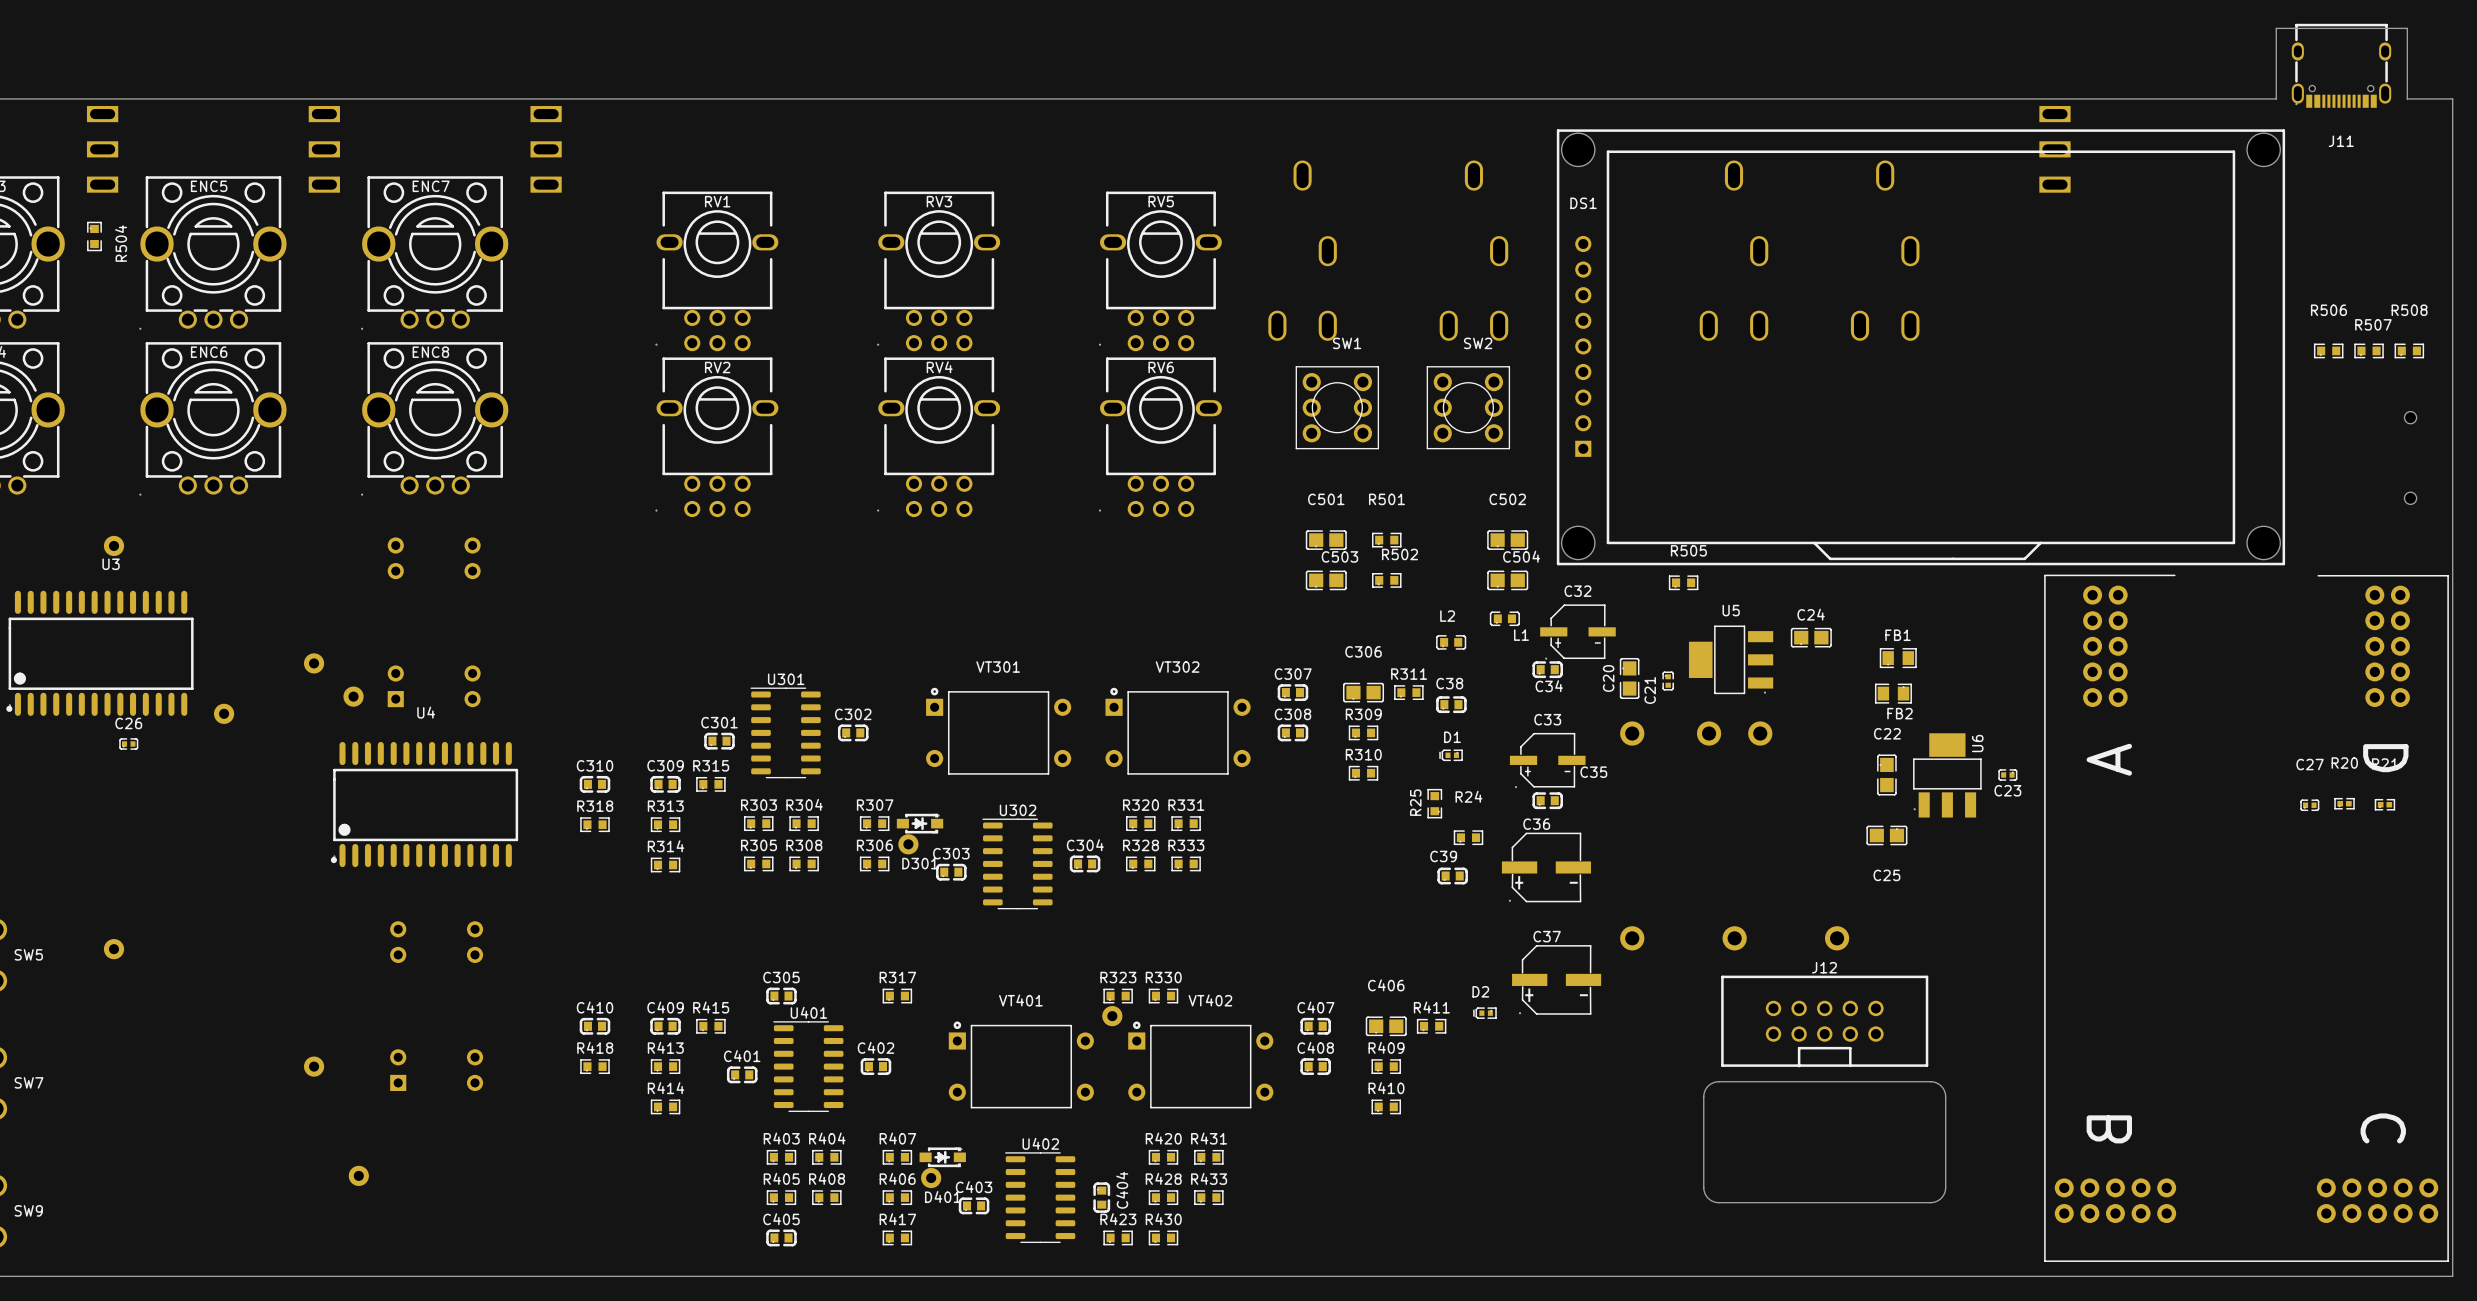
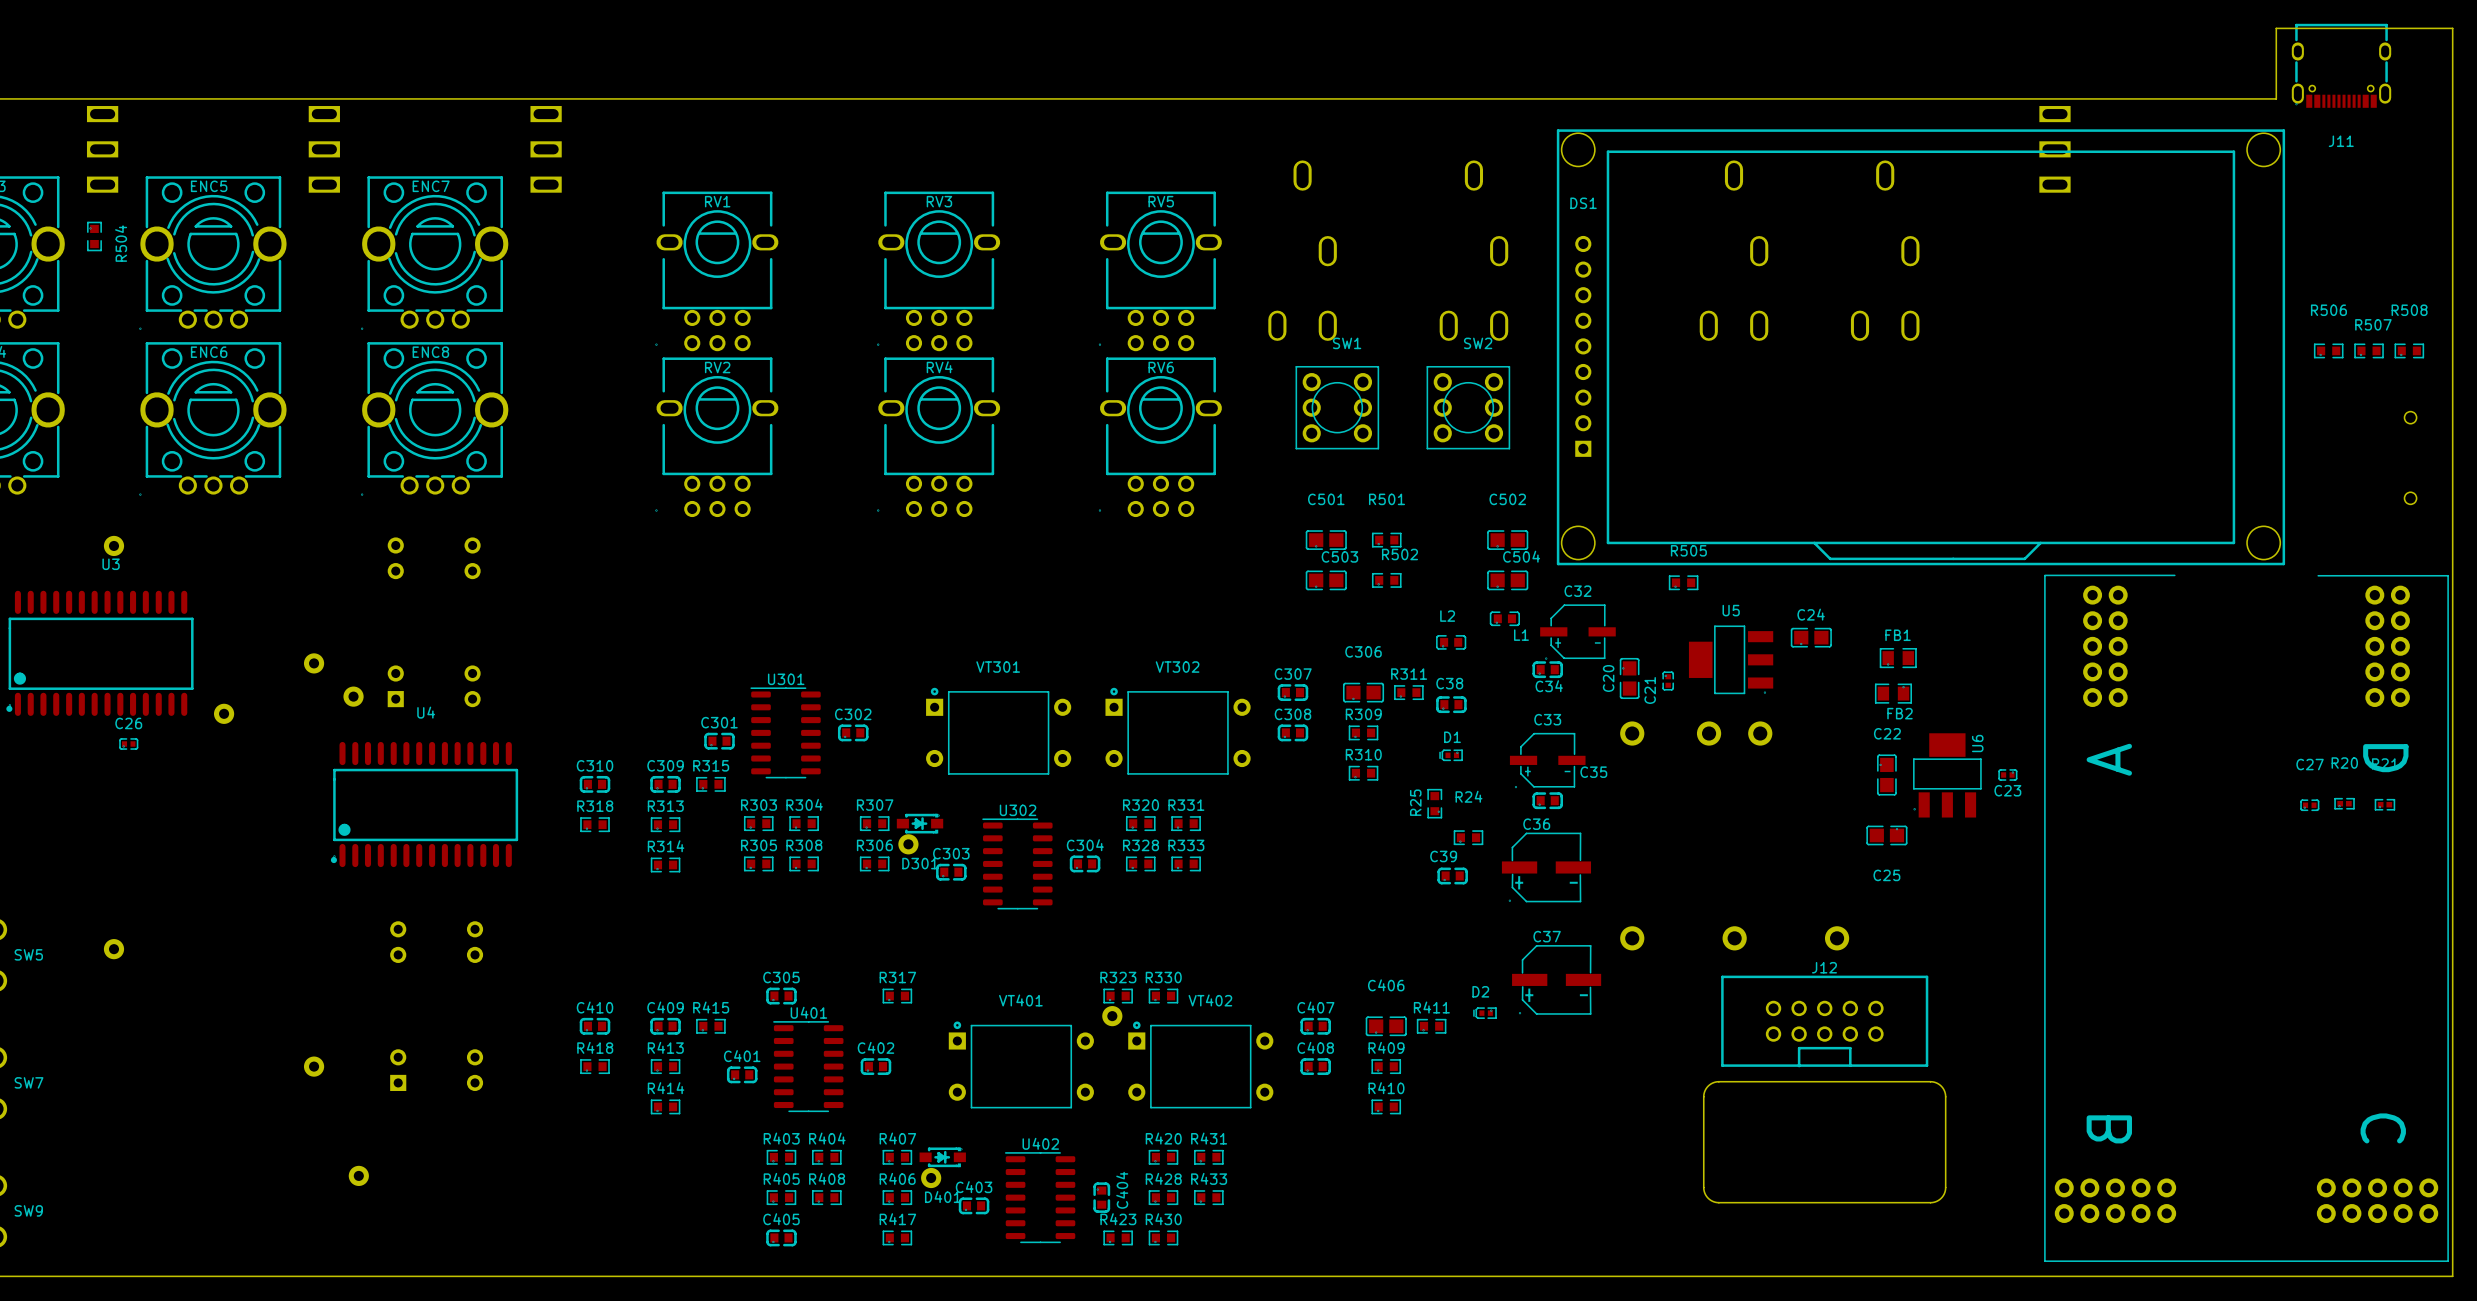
board edge: (2407, 28) (2407, 98) (2452, 98) -> (2407, 28) (2452, 28) (2452, 98)

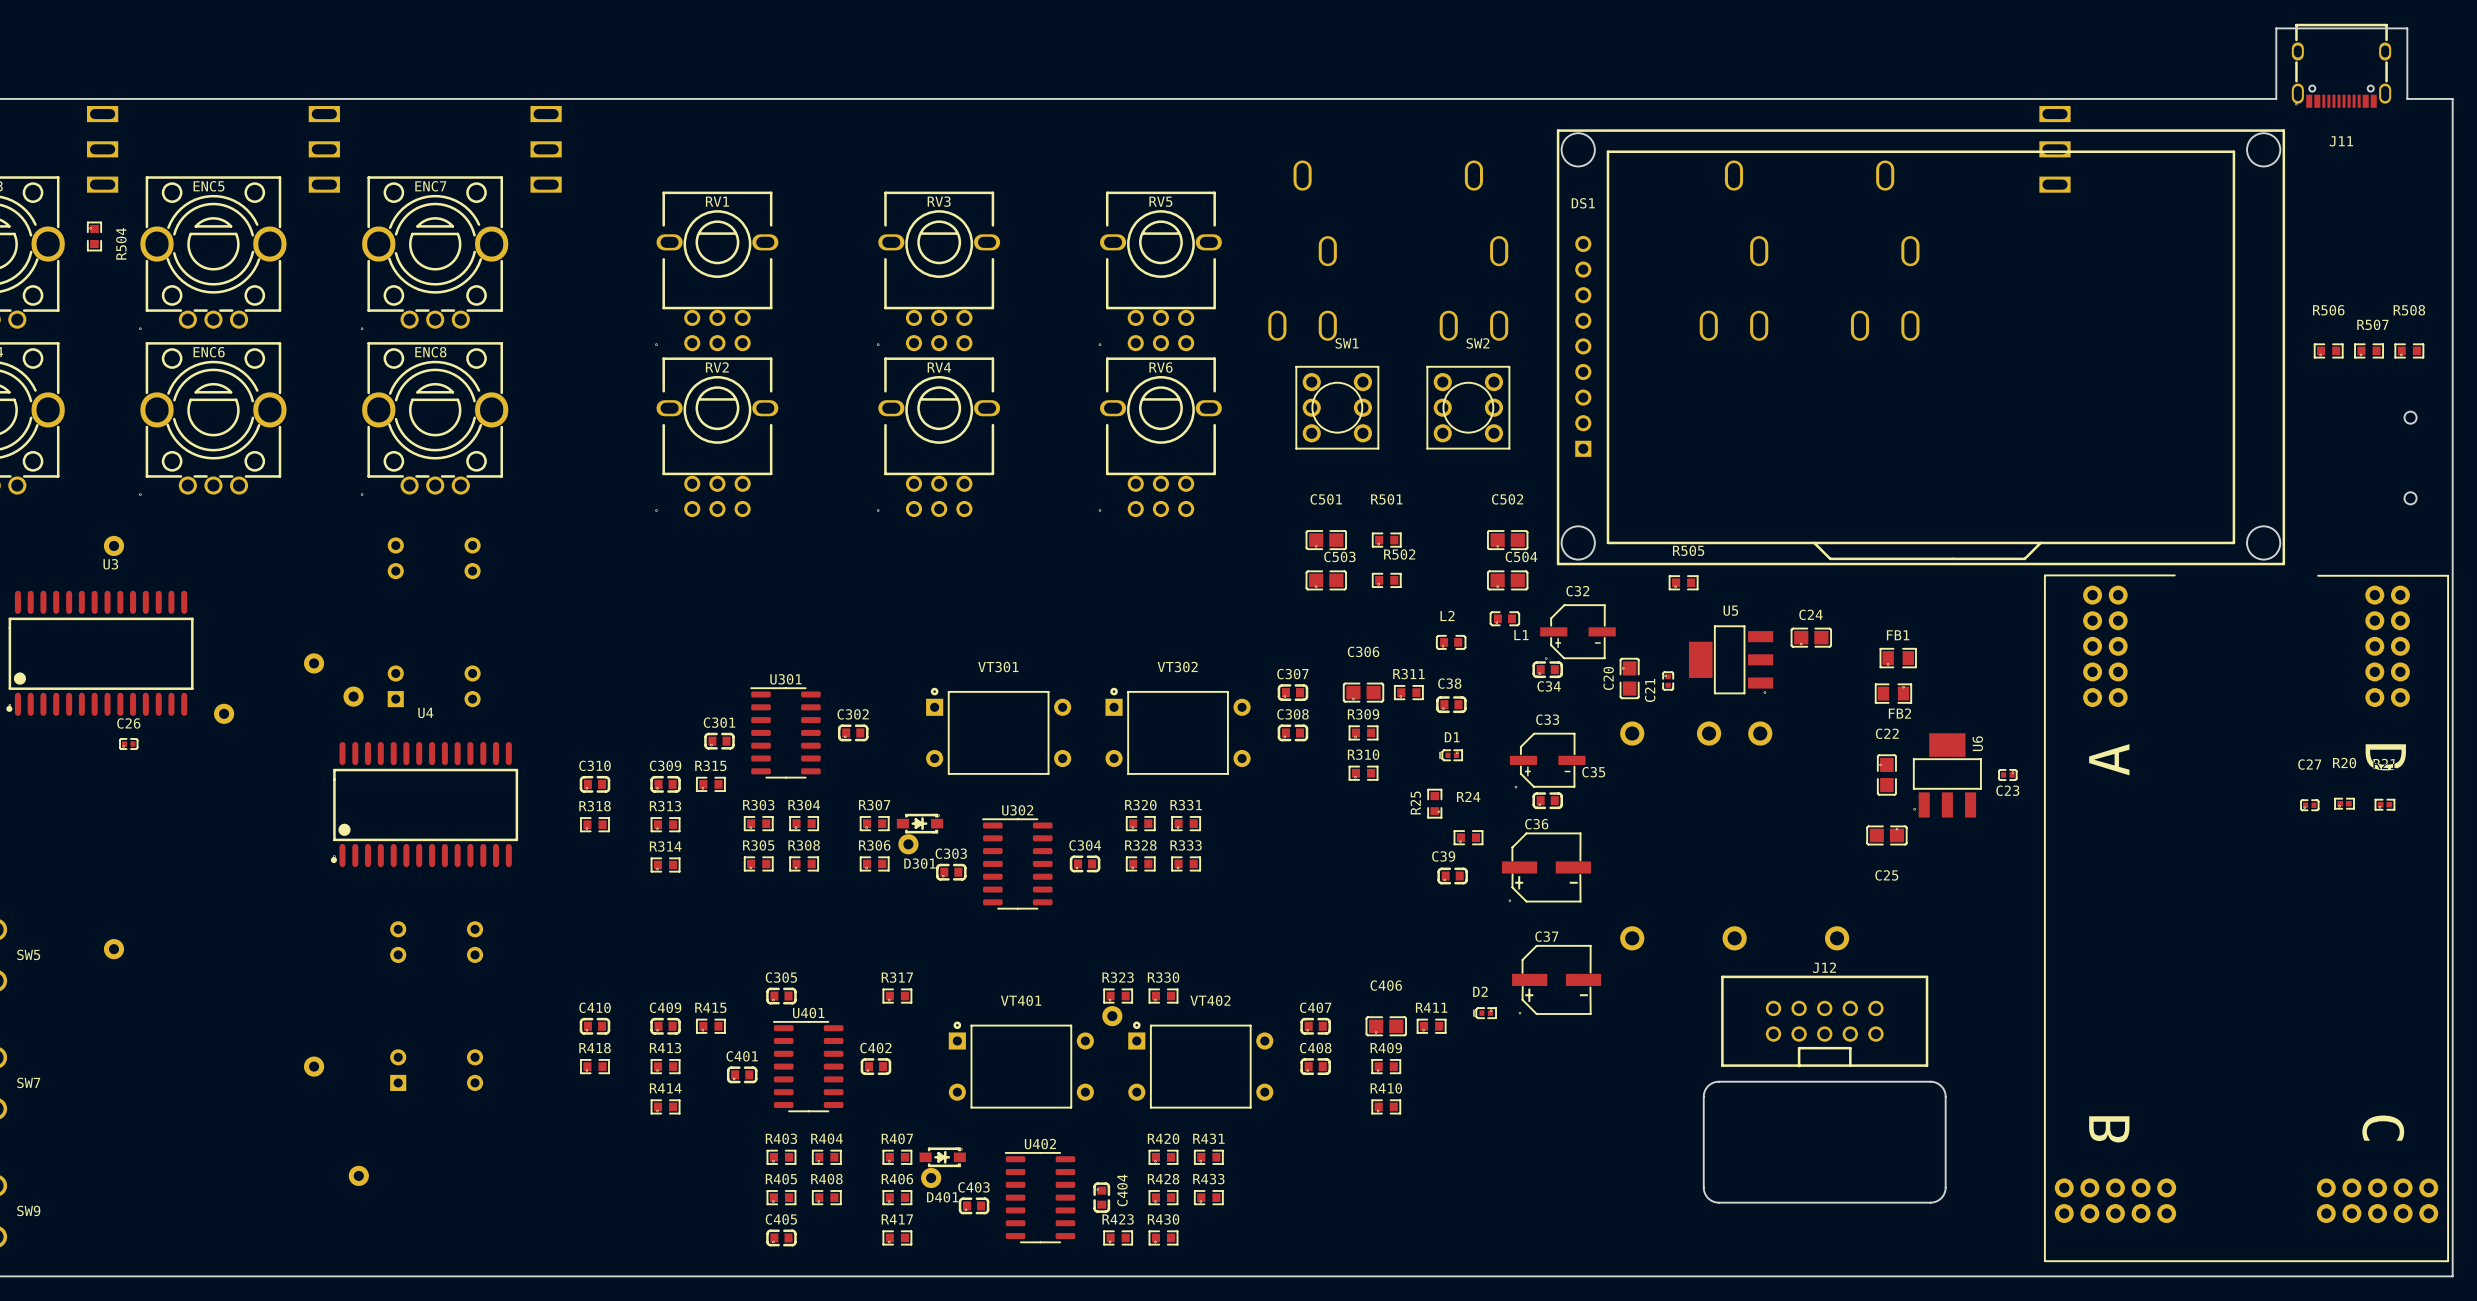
board edge: (2407, 28) (2452, 28) (2452, 98) -> (2407, 28) (2407, 98) (2452, 98)

